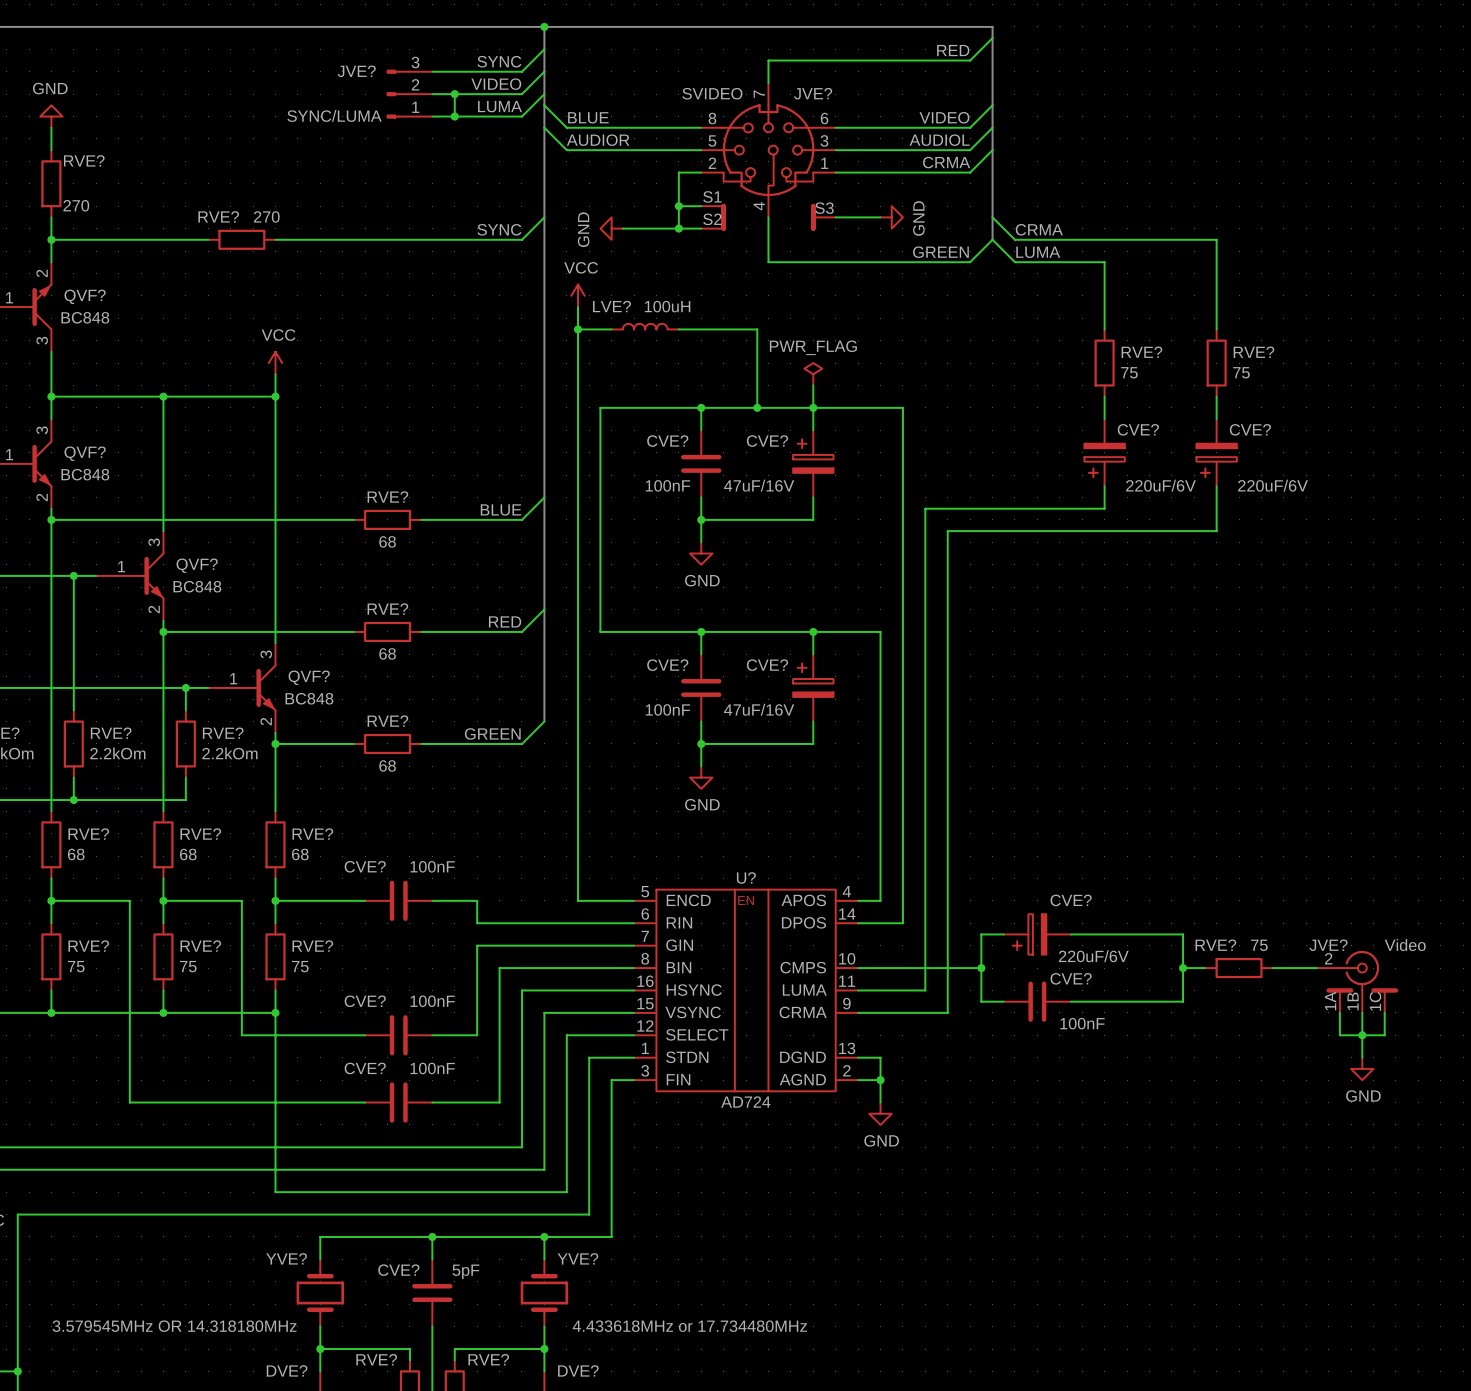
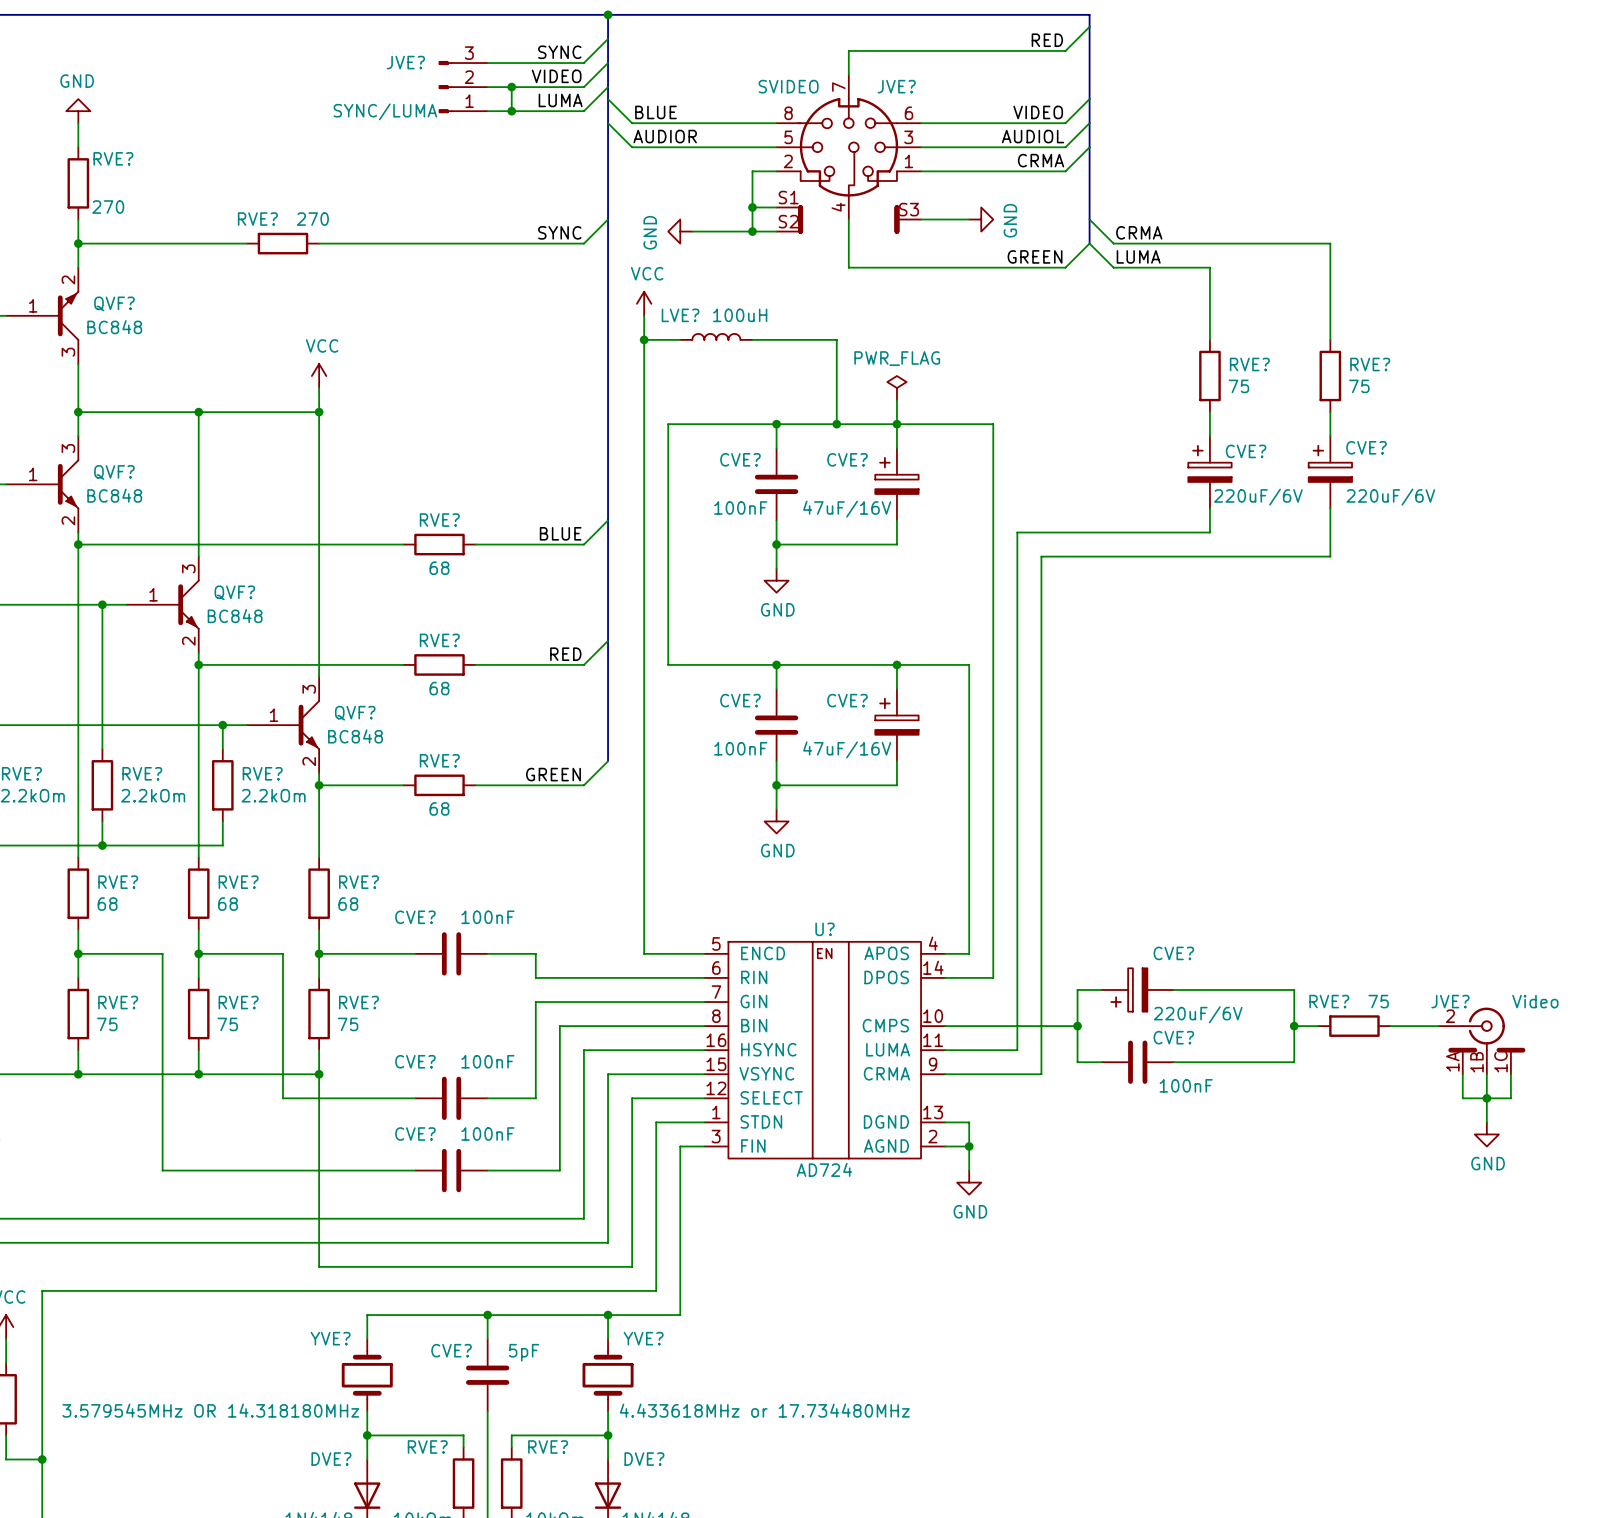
CVE? flip: as is (1104, 460) -> up-down (1209, 463)
CVE? flip: as is (1216, 460) -> up-down (1330, 463)

